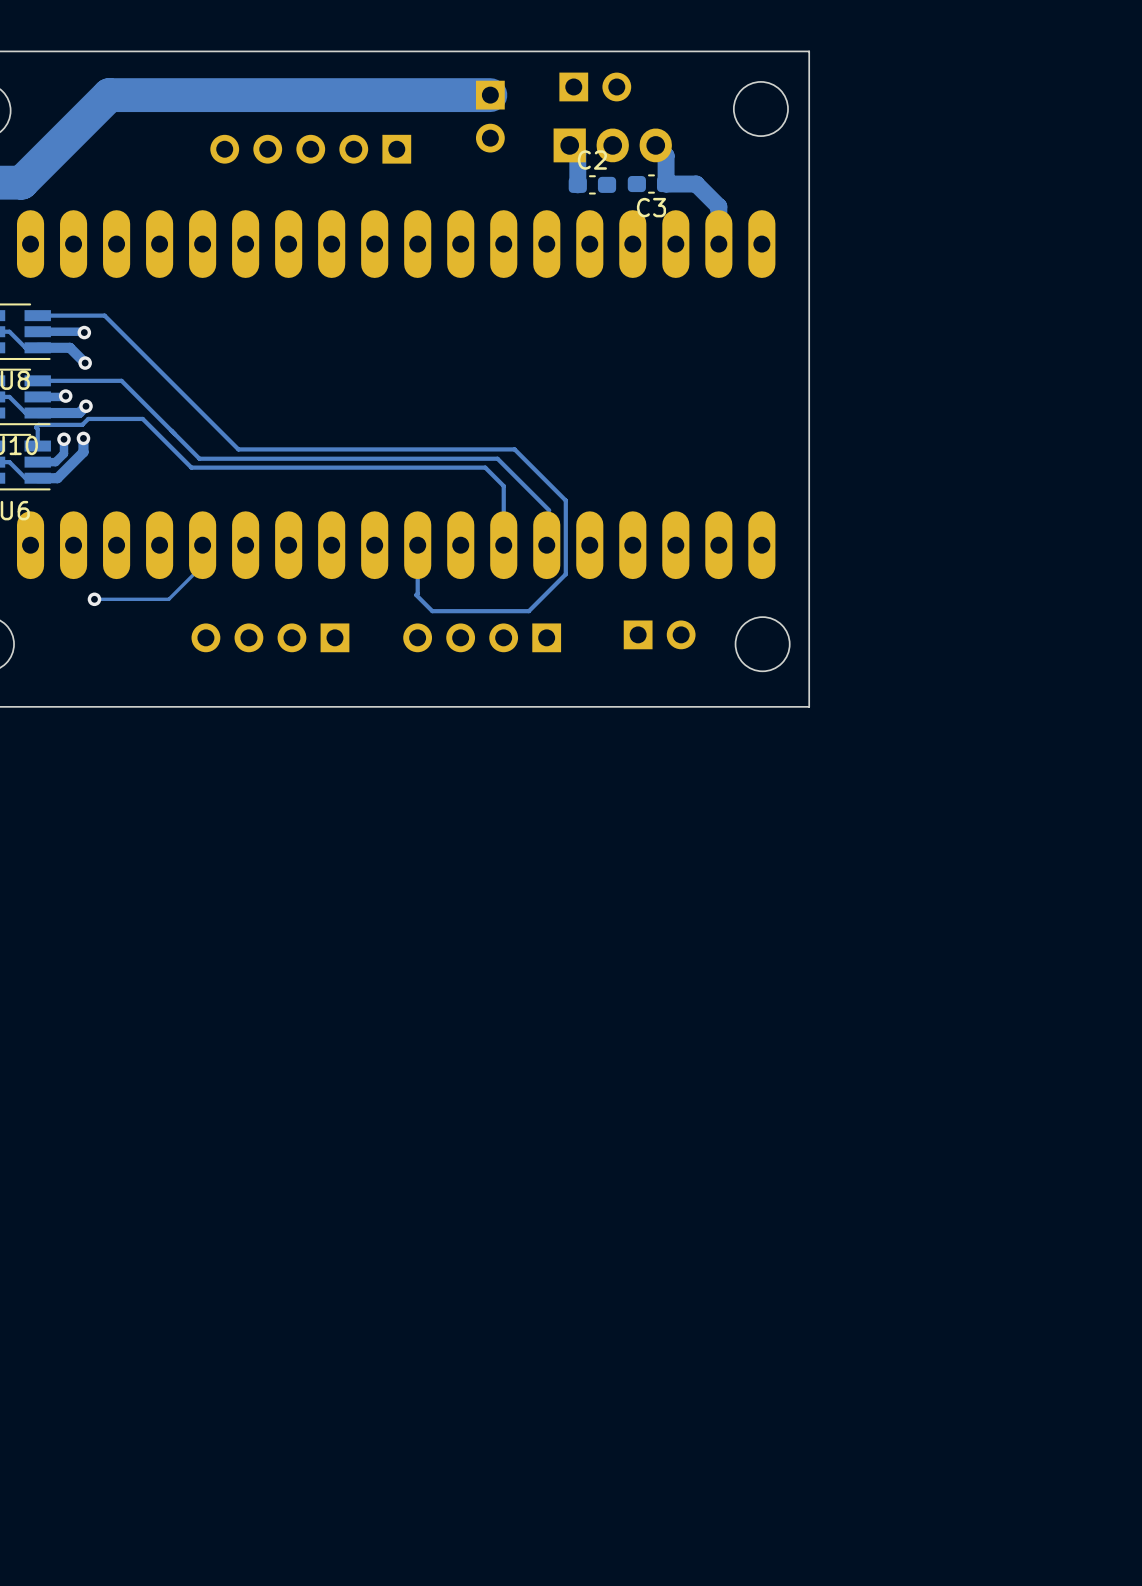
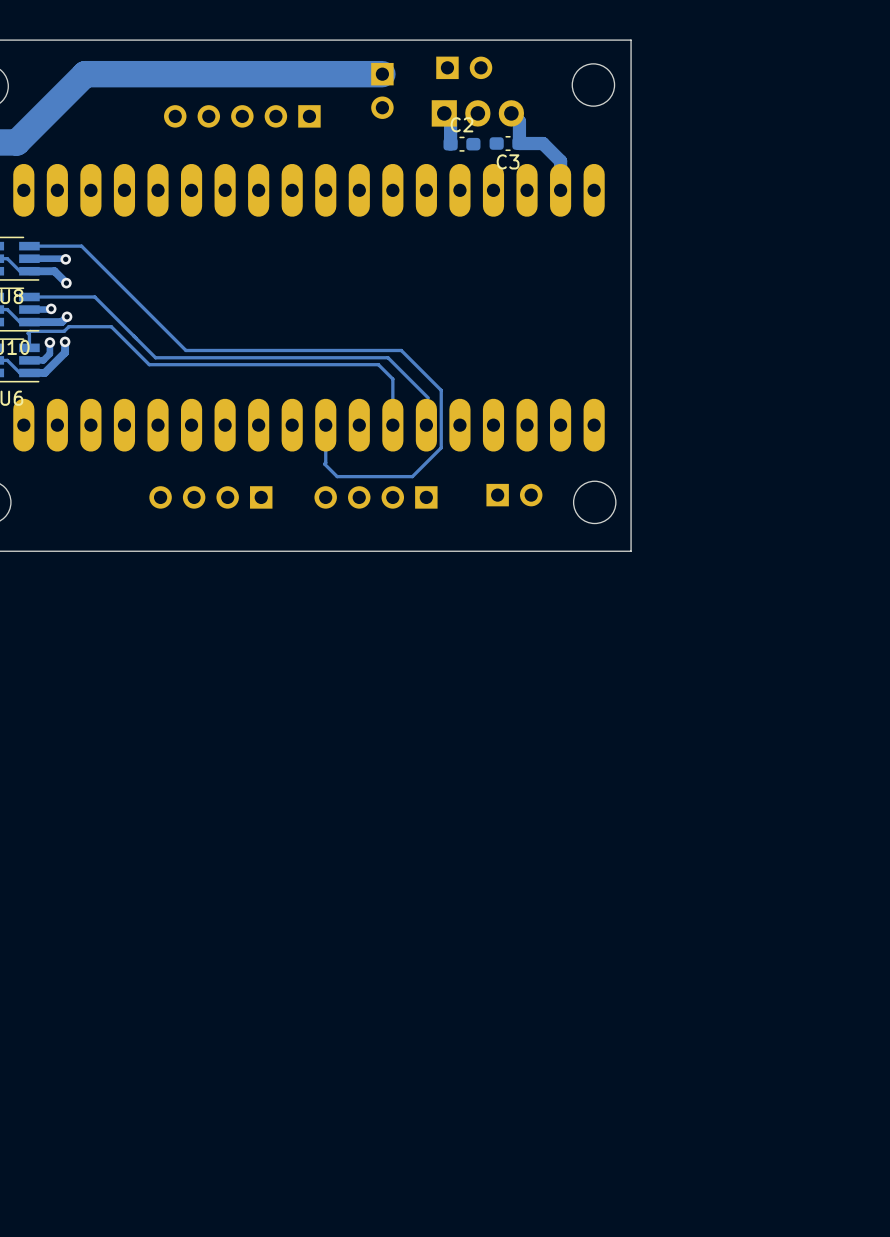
track: (202, 545) (202, 565) (168, 599) (94, 599) -> none
via: (94, 599) -> none

